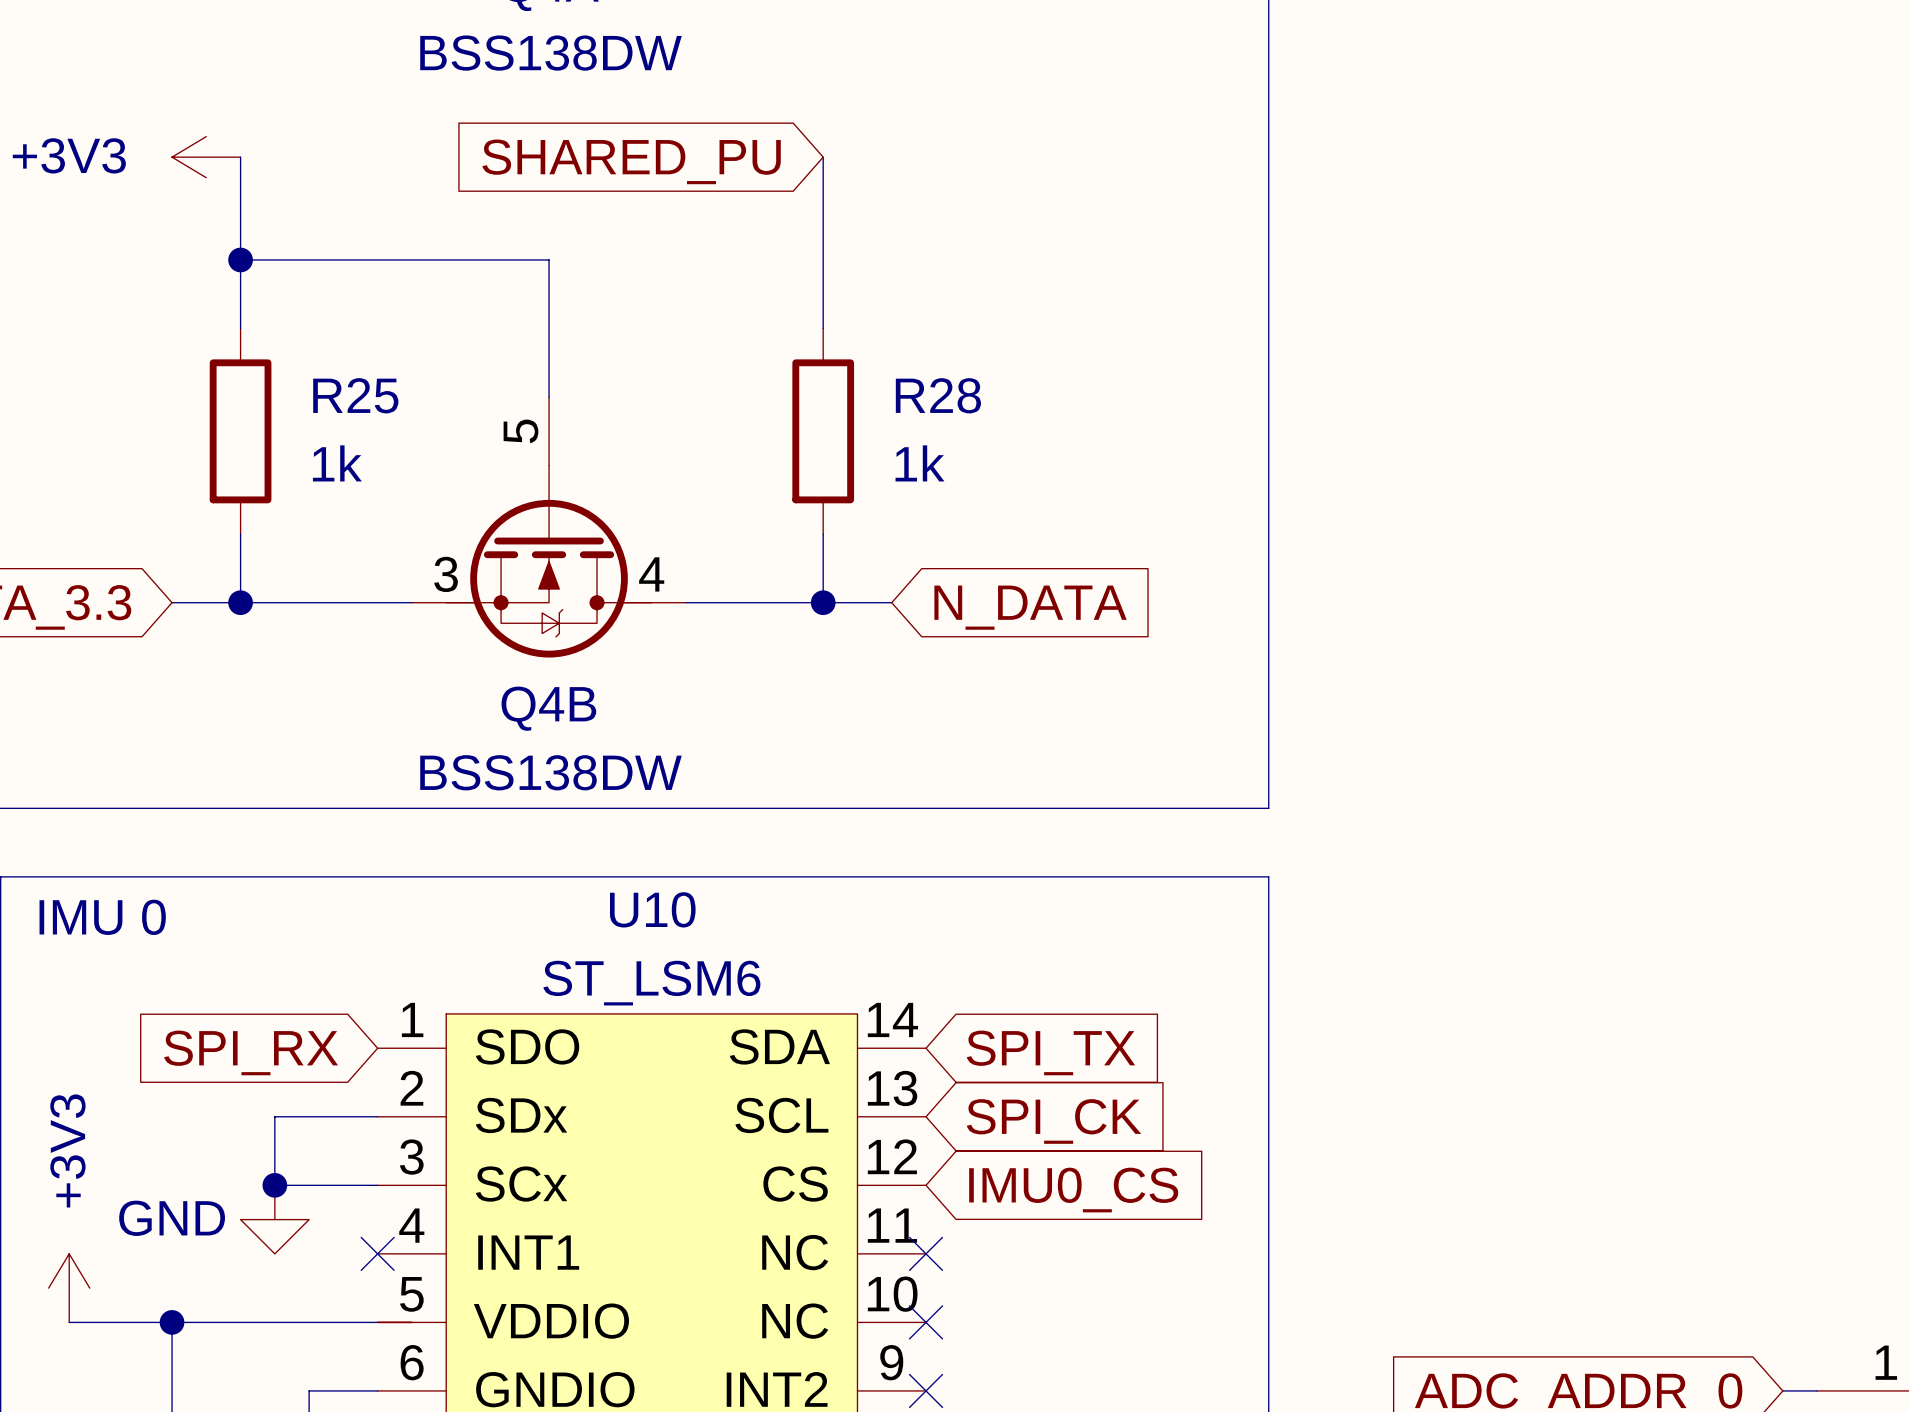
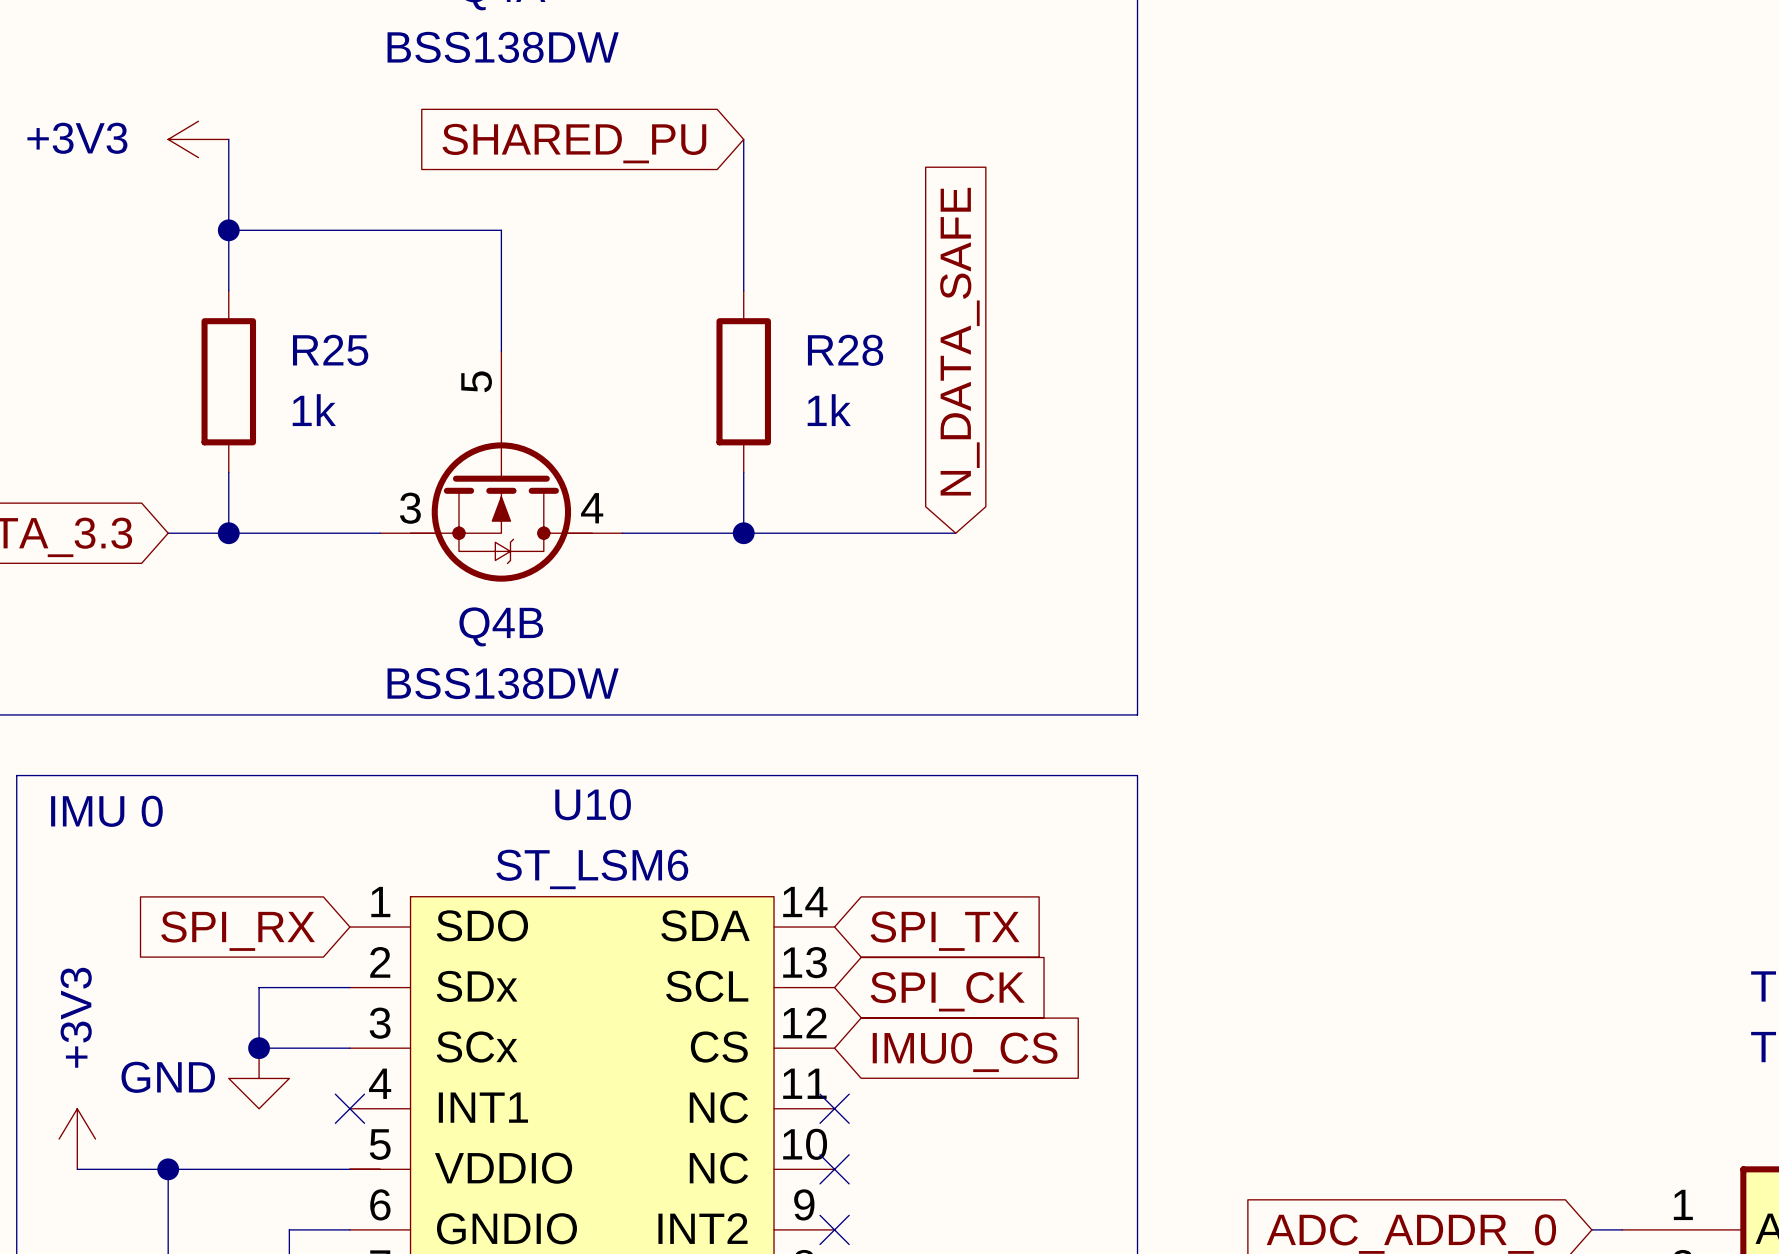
wire: none -> (804, 533) (955, 533)
global label: N_DATA (1030, 607) -> N_DATA_SAFE (959, 341)

